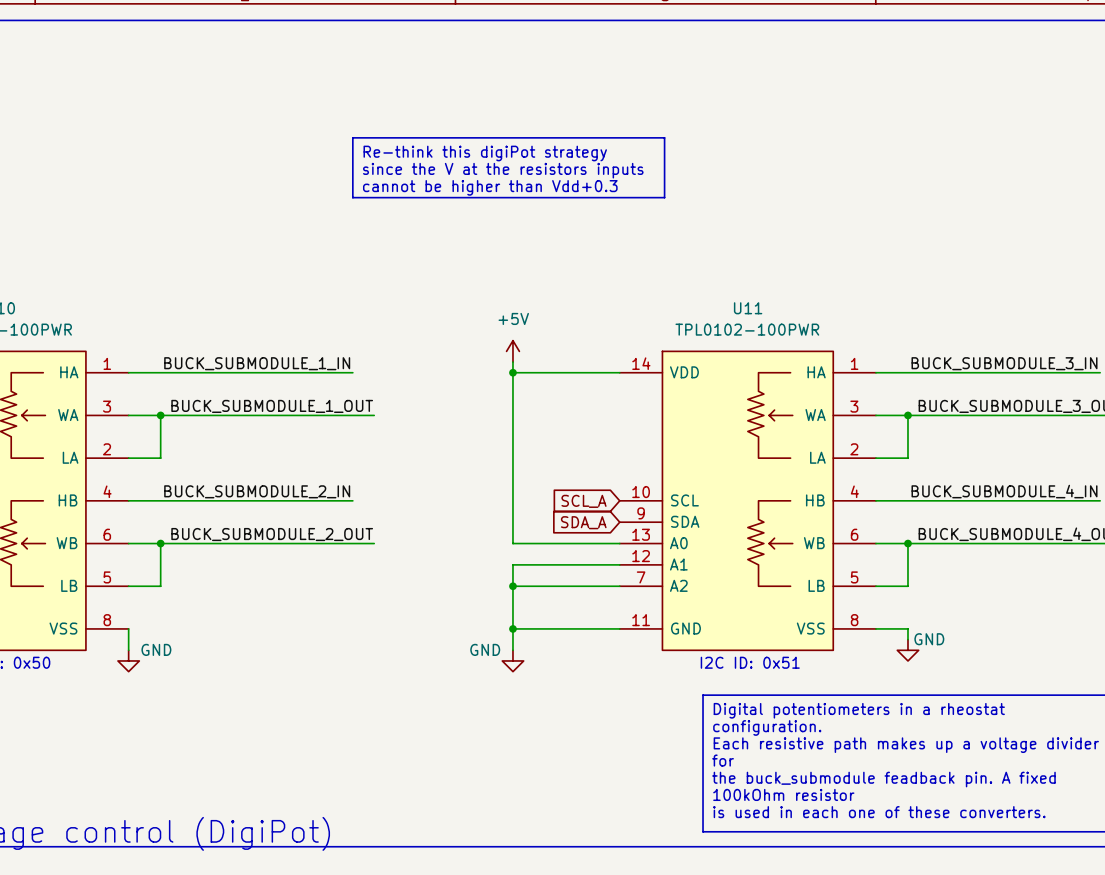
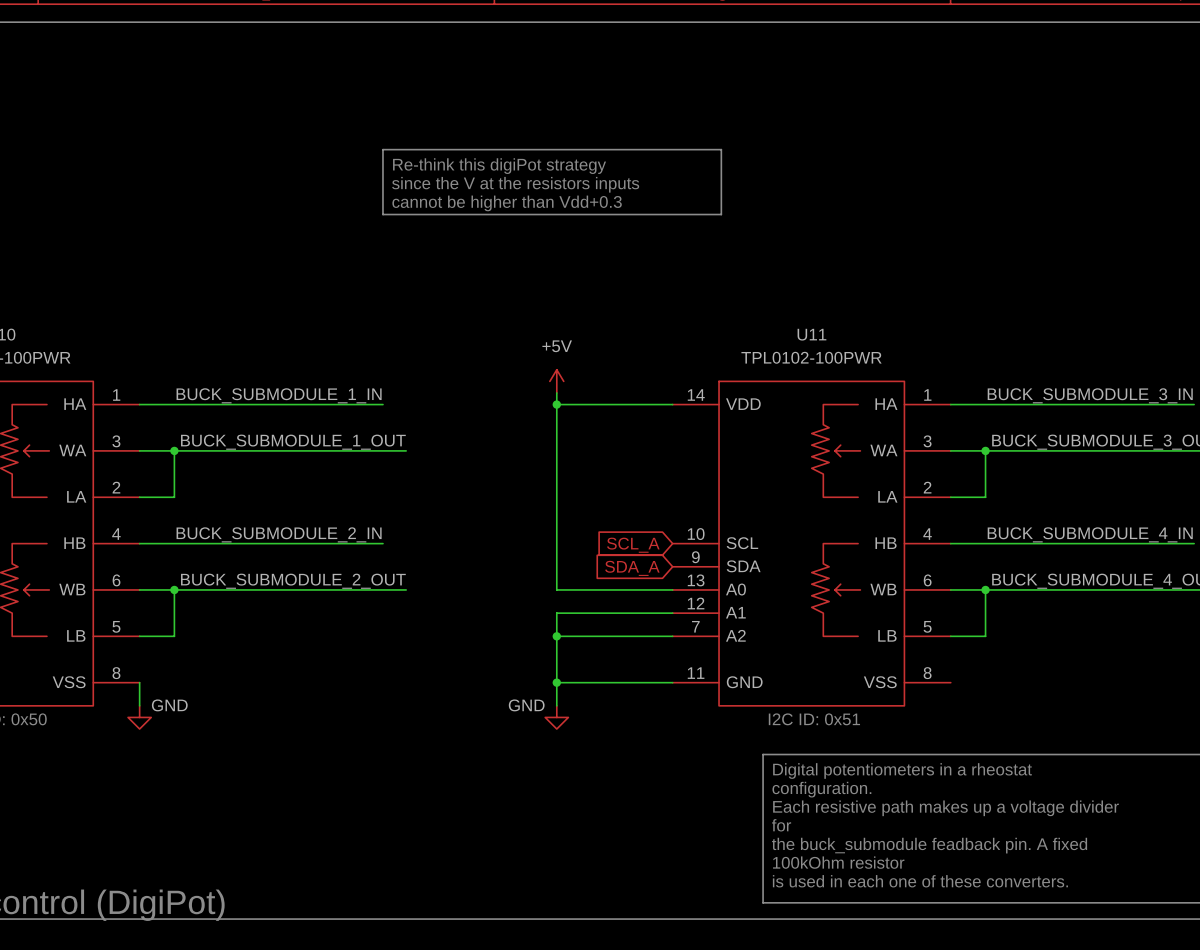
wire: (875, 628) (907, 628) (907, 639) -> none
power symbol: GND (907, 650) -> none

